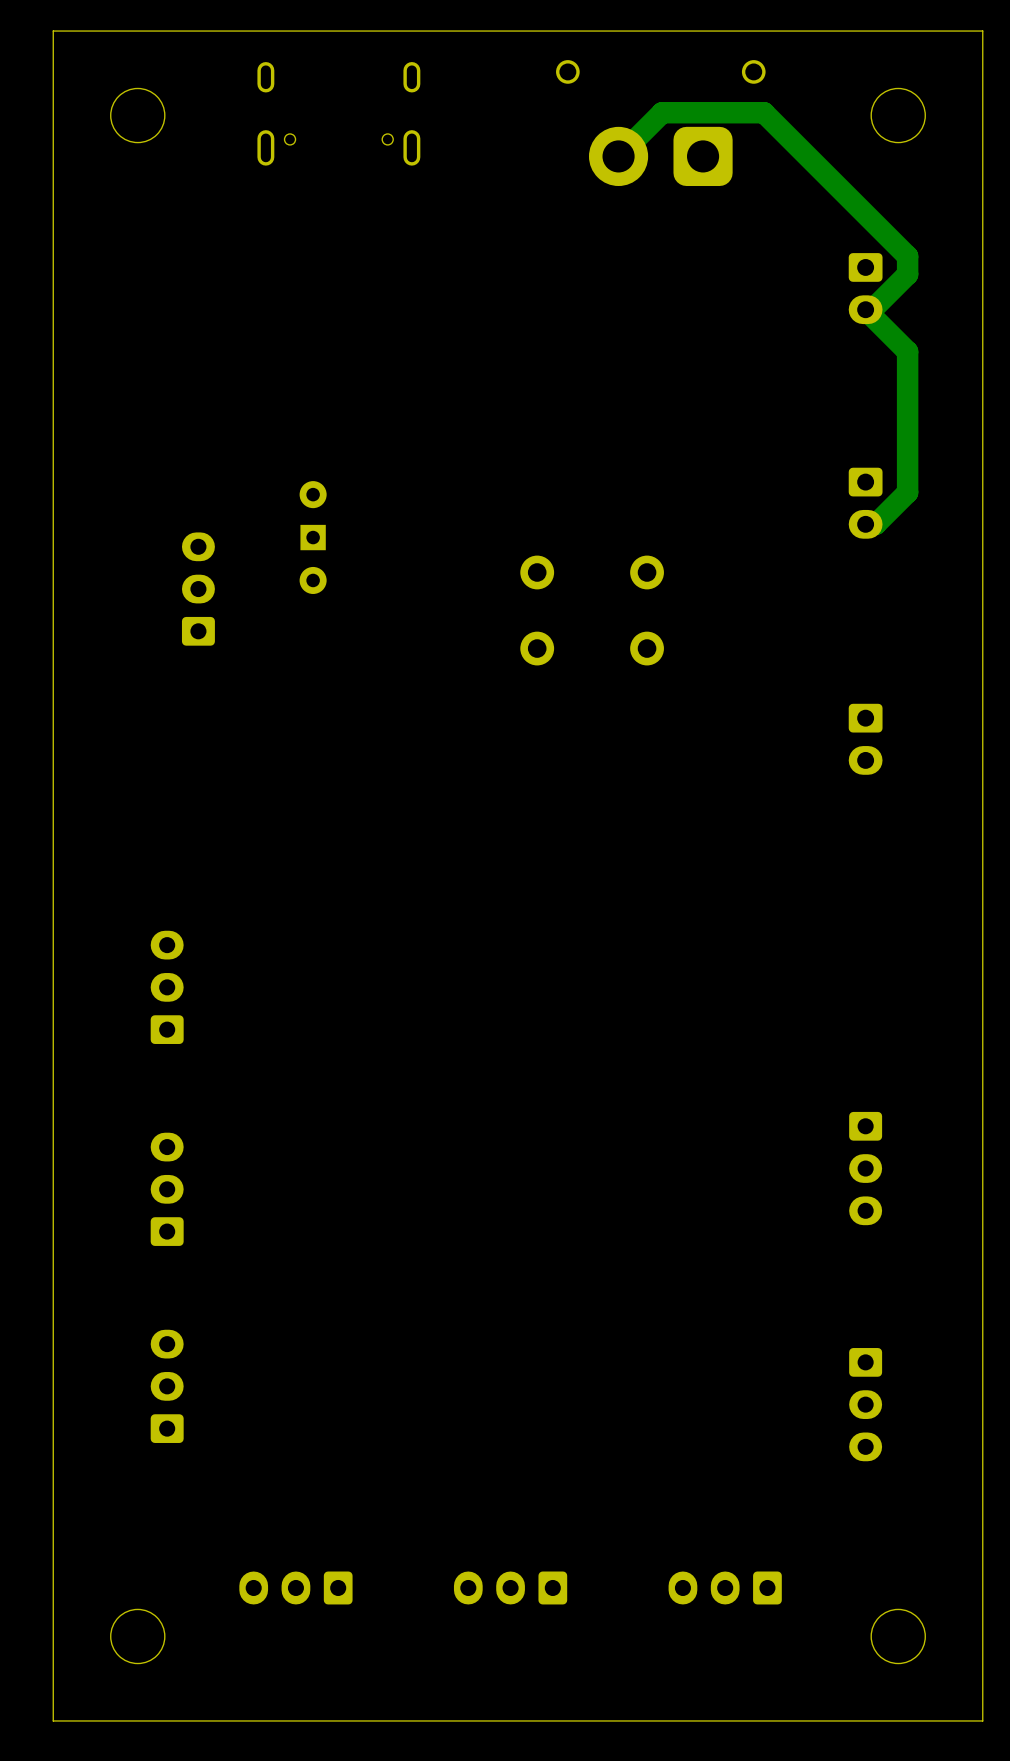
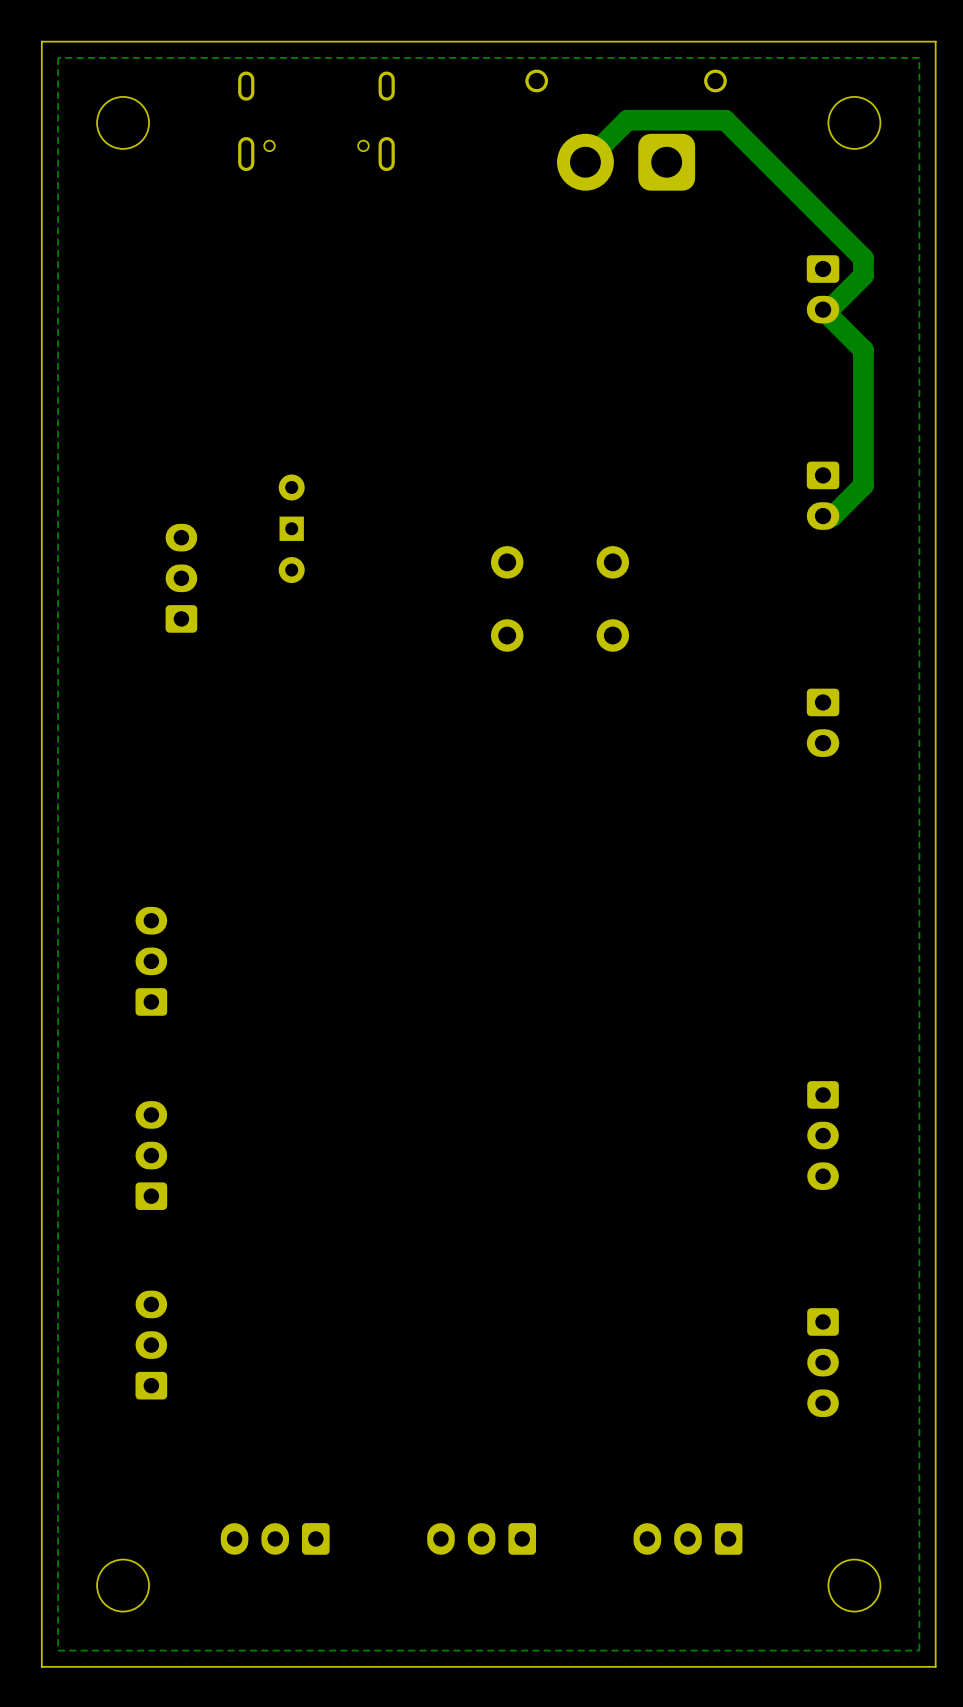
zone outline: none -> (919, 57) (58, 57) (58, 1650) (919, 1650) (919, 57)

